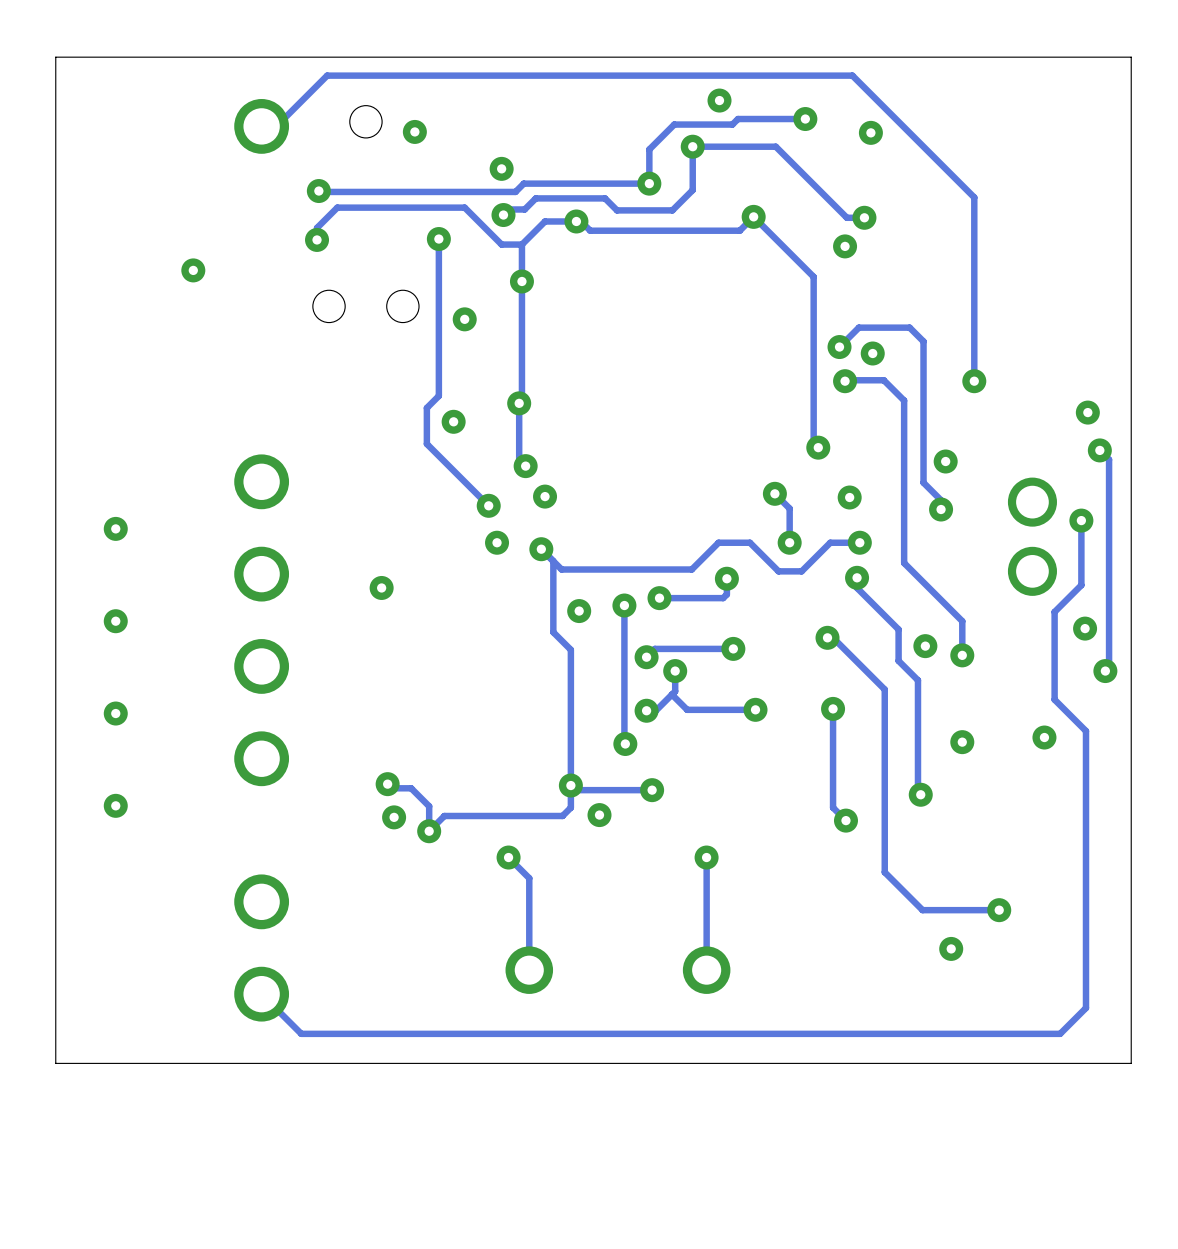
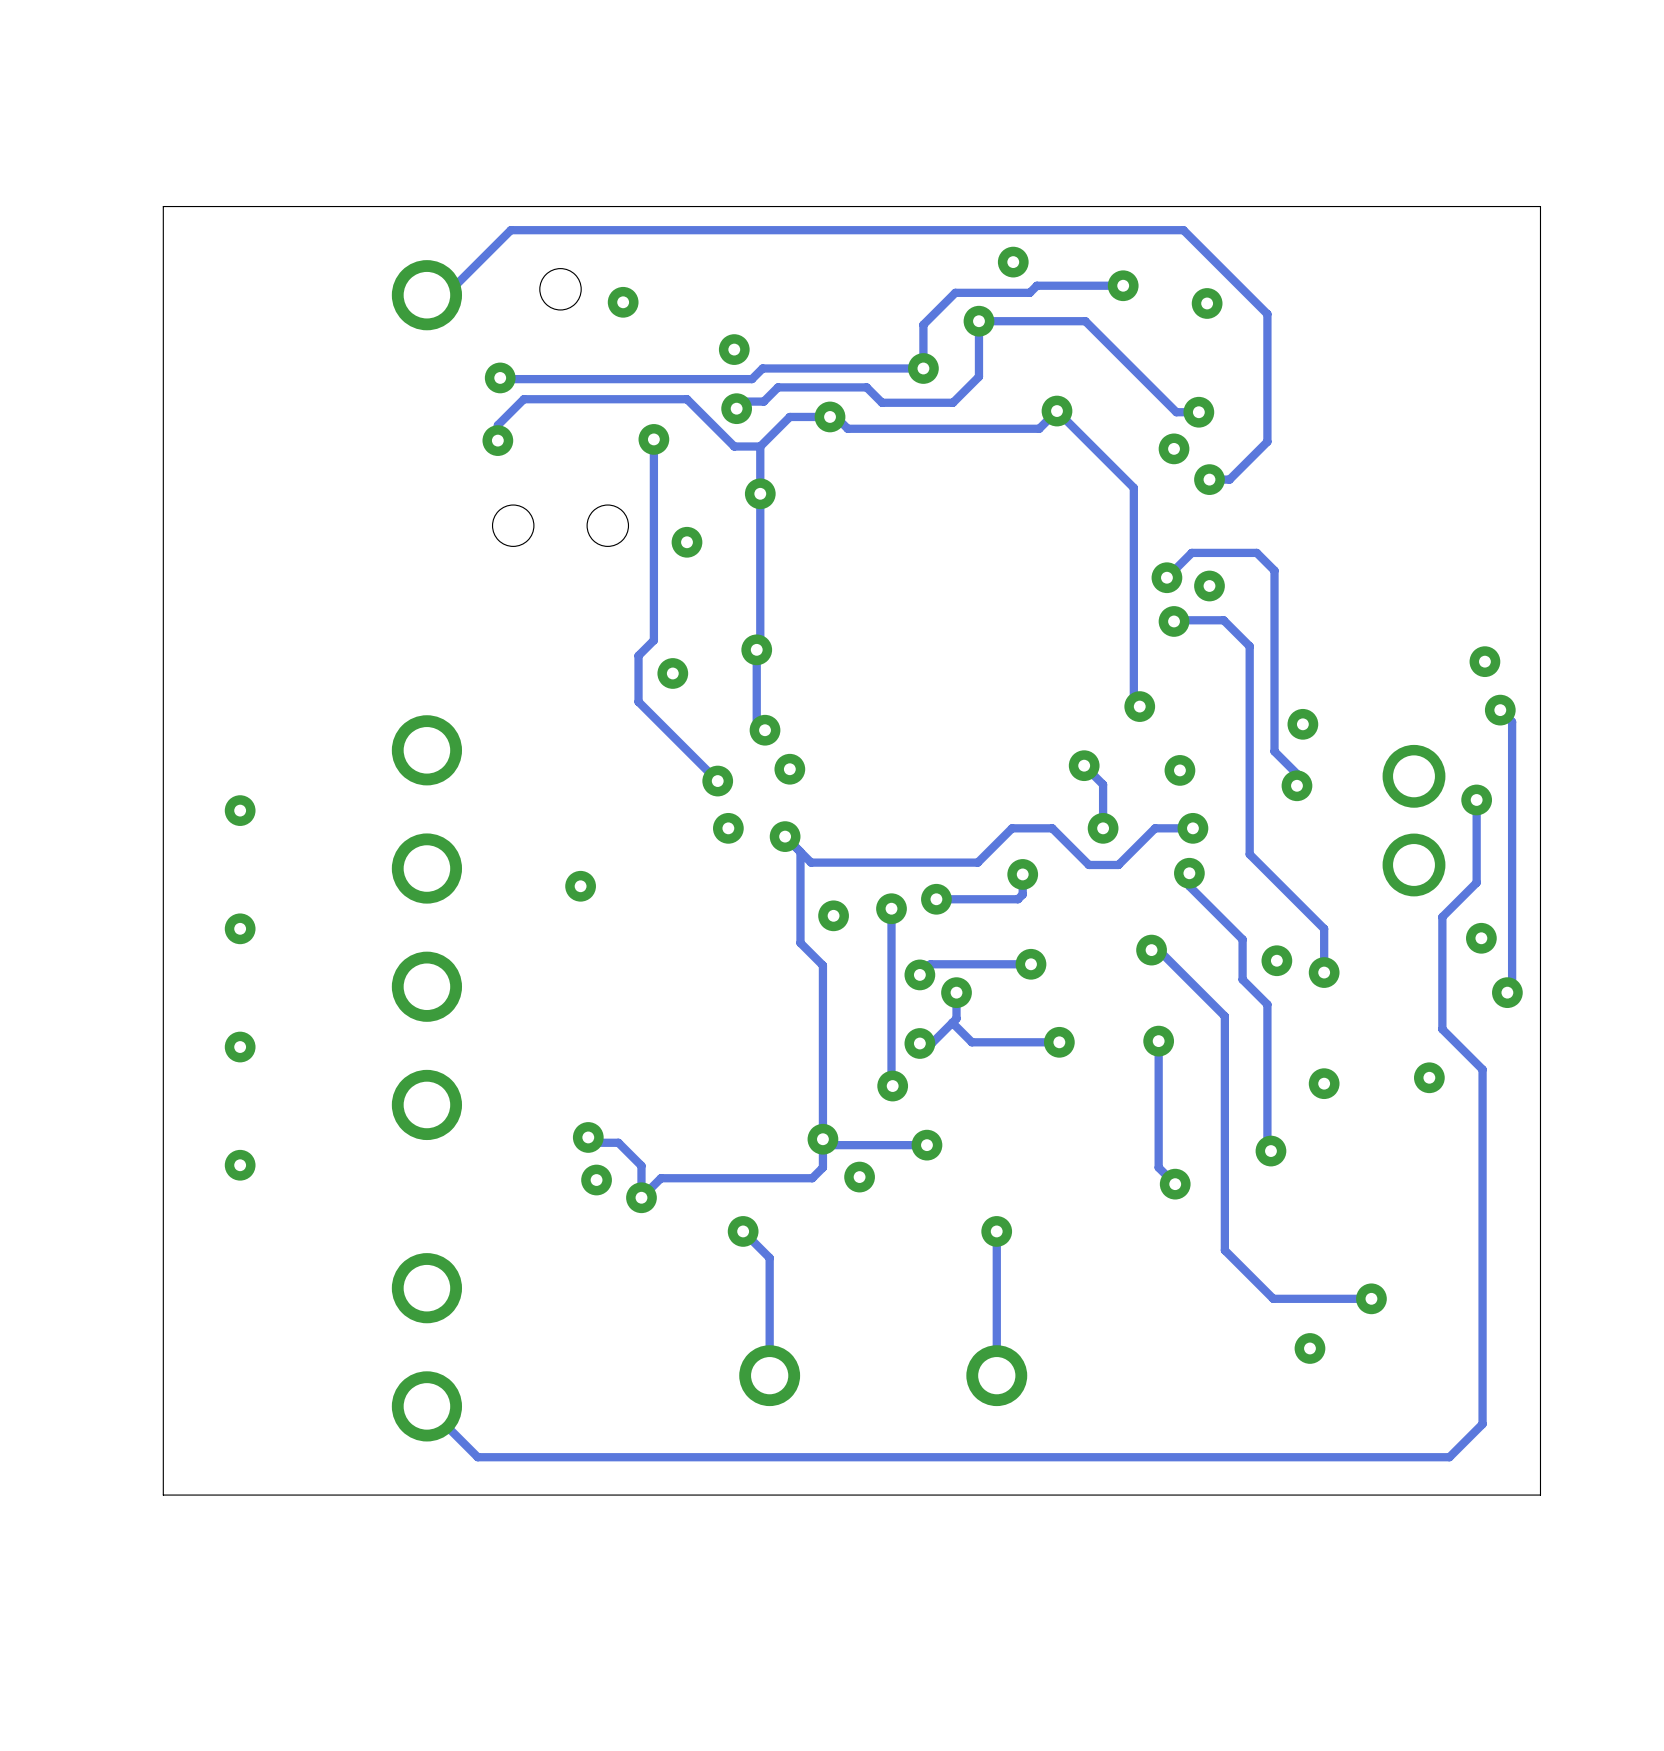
track: (917, 141) (974, 197) (974, 381) -> (1267, 314) (1267, 441) (1229, 479) (1209, 479)
via: (193, 270) -> none
via position: (974, 381) -> (1209, 479)

